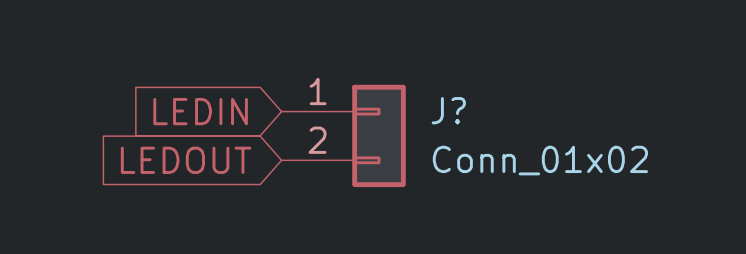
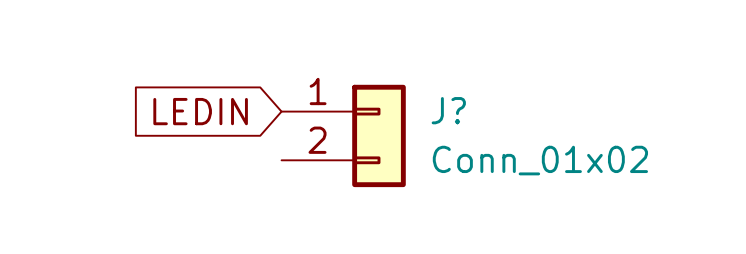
global label: LEDOUT (186, 160) -> none

